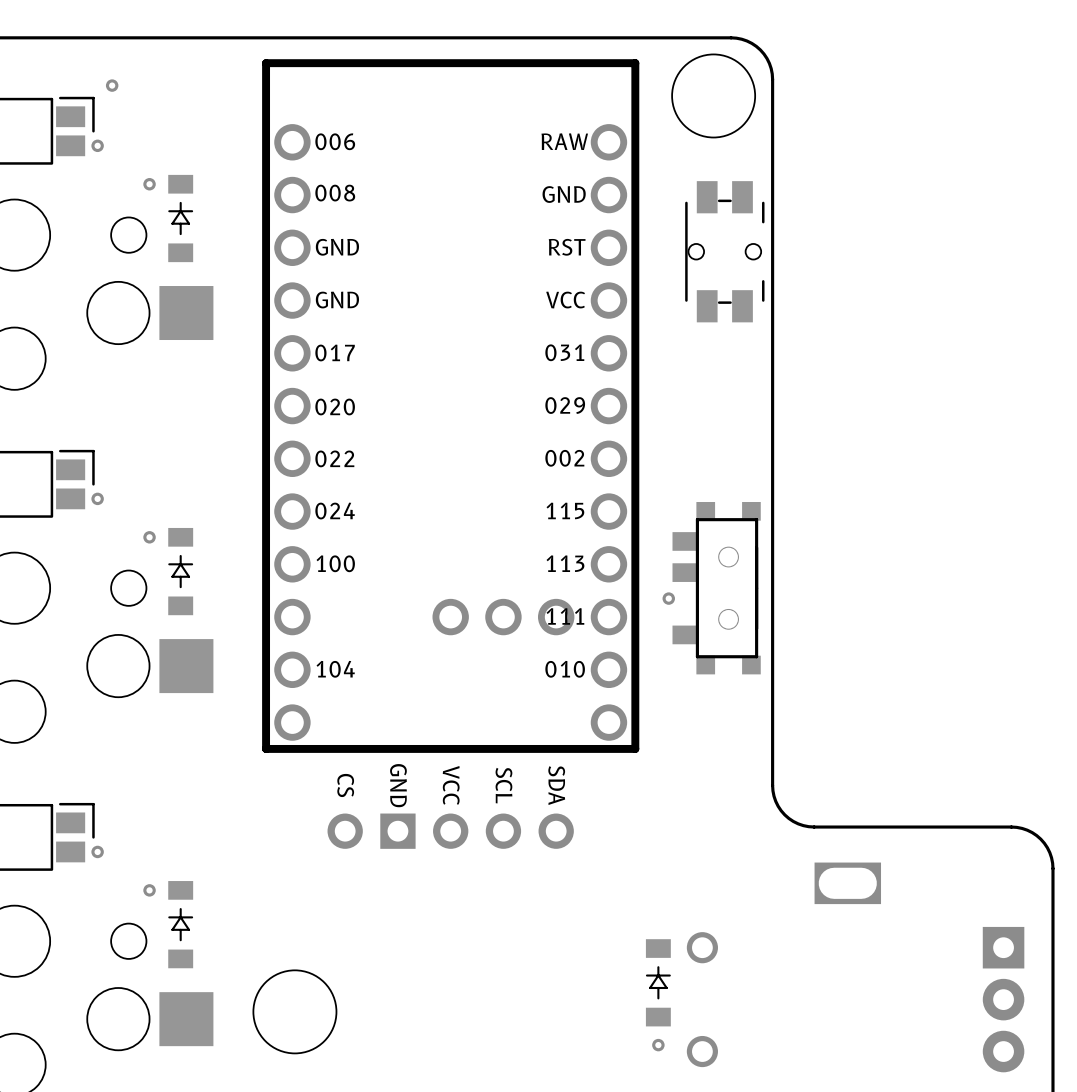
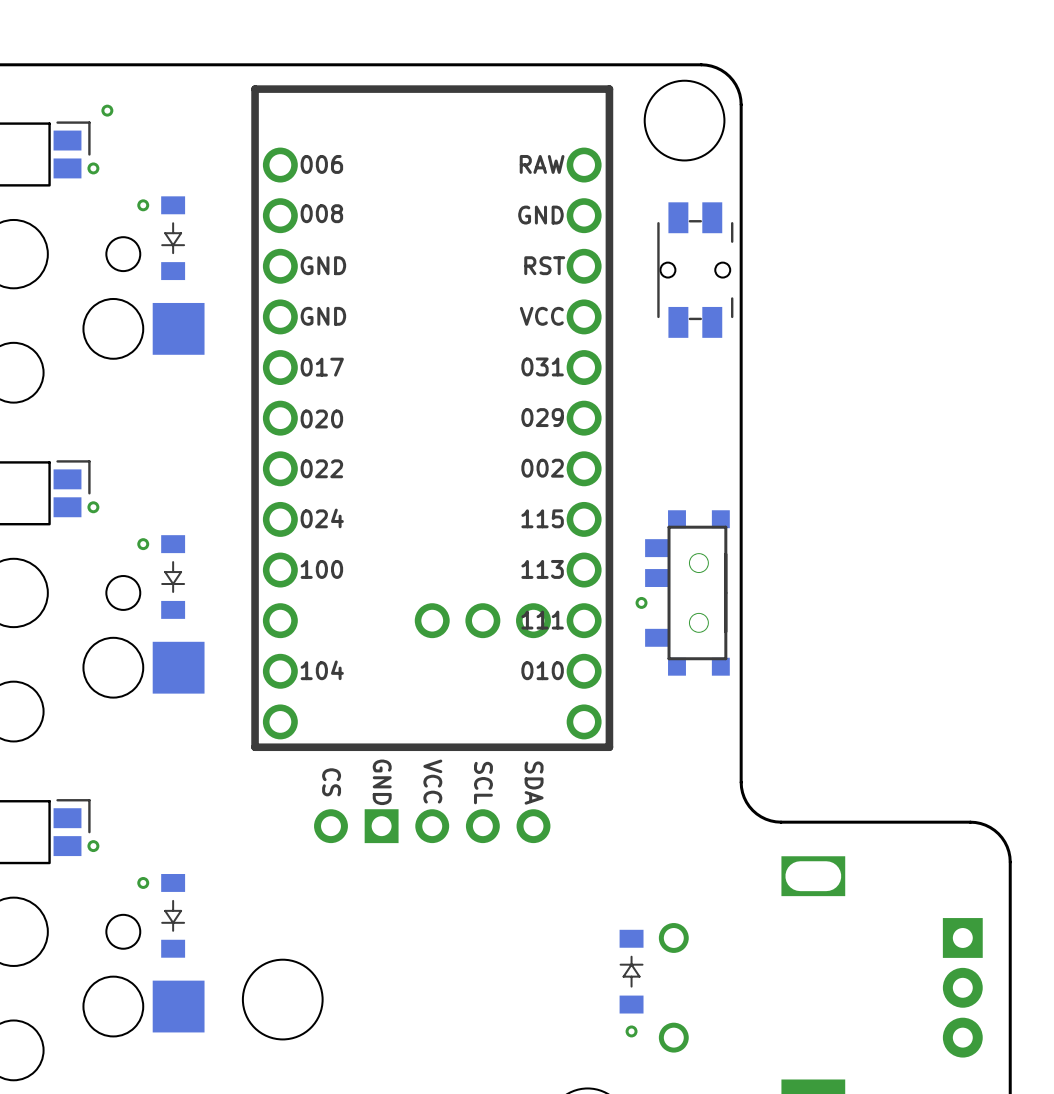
part rotation: 0° (180, 218) -> 180° (173, 238)
part rotation: 0° (180, 571) -> 180° (173, 577)
part rotation: 0° (180, 924) -> 180° (173, 915)

